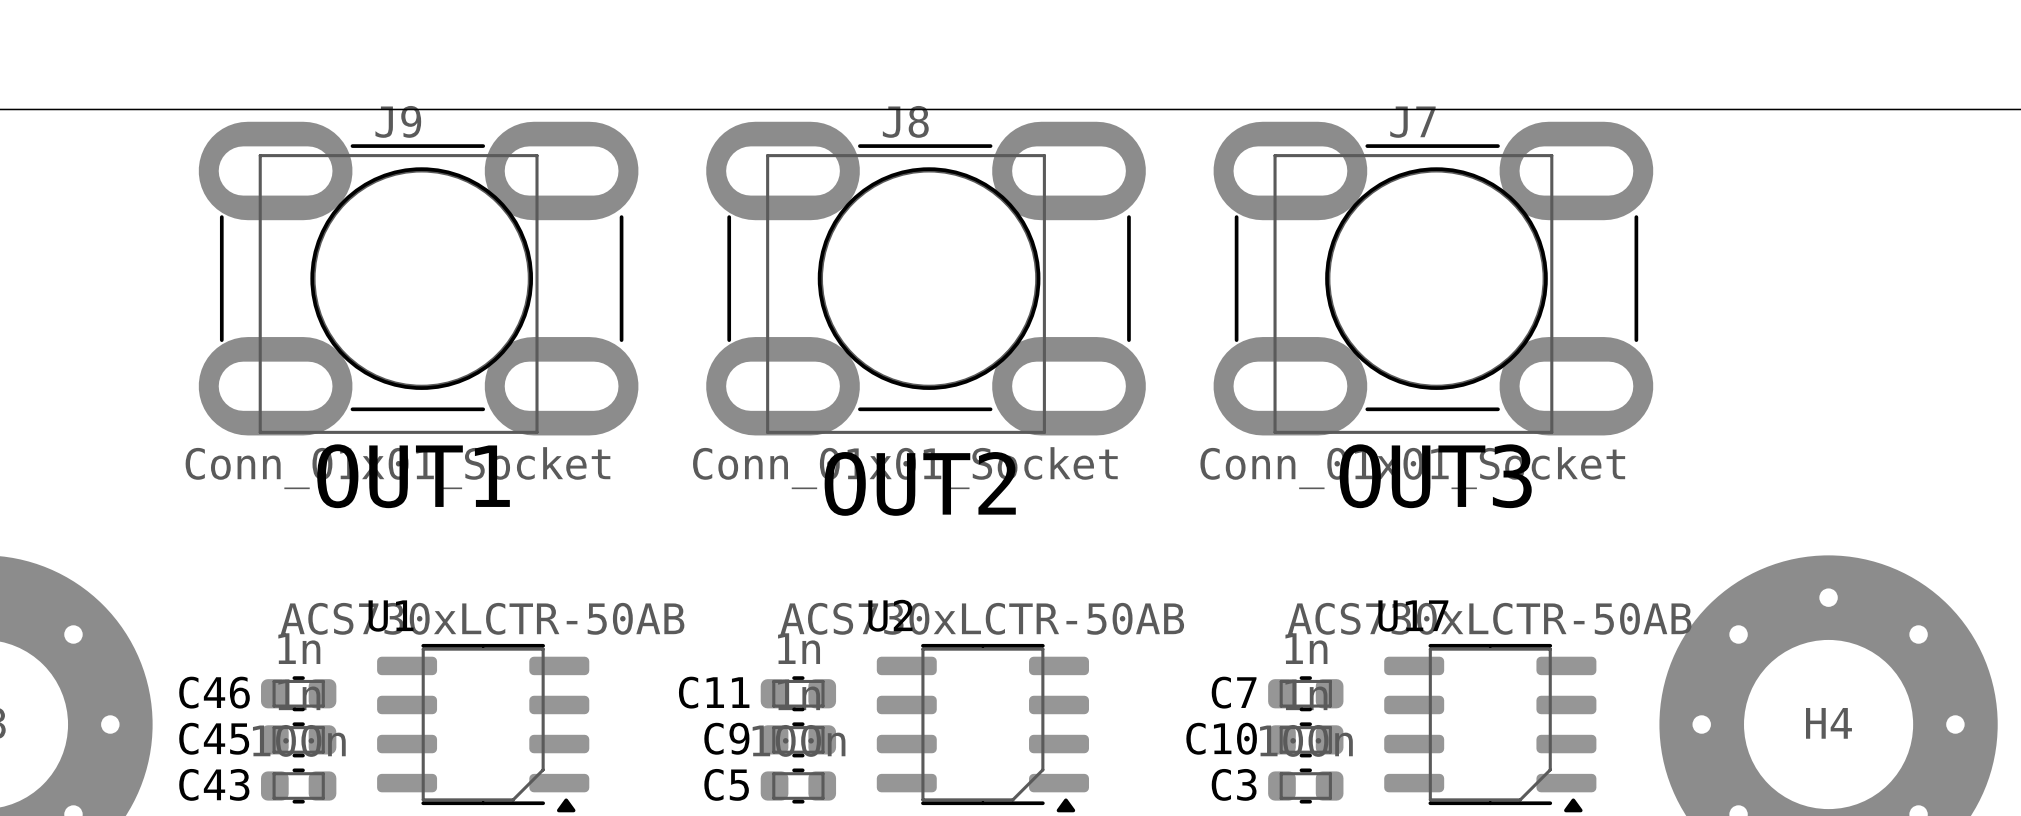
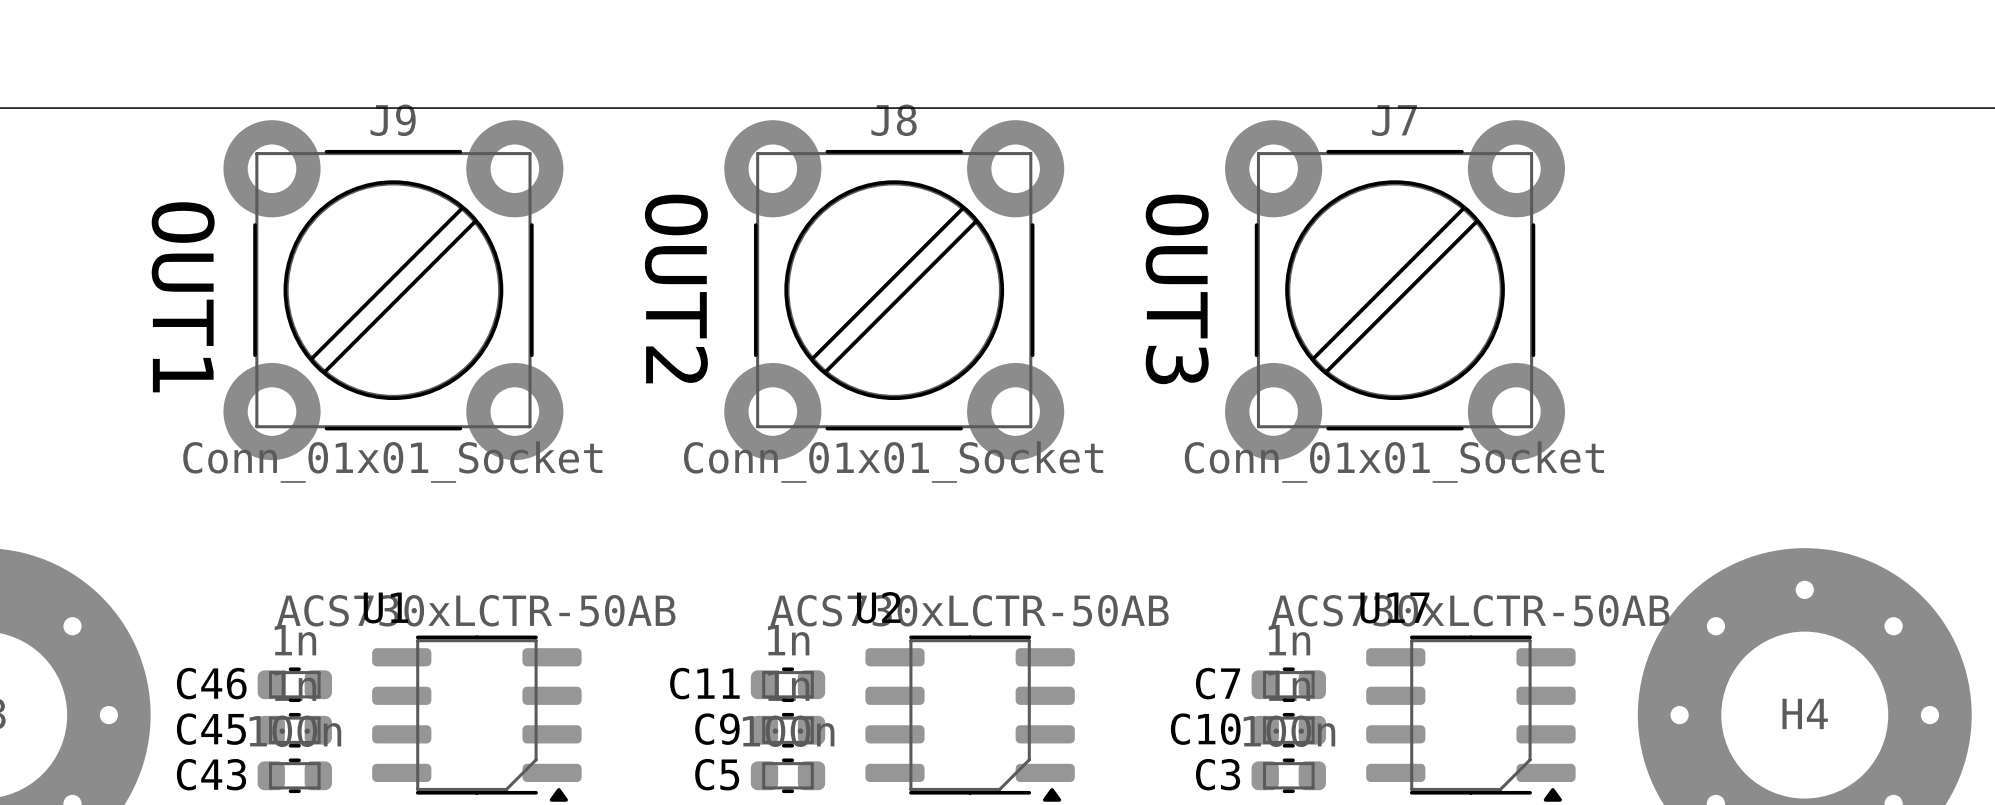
J9 footprint: [198, 121, 639, 436] -> [223, 120, 564, 461]
J8 footprint: [706, 121, 1146, 436] -> [724, 120, 1065, 461]
J7 footprint: [1213, 121, 1654, 436] -> [1225, 120, 1565, 461]
text rotation: 0° (413, 476) -> 90° clockwise (183, 297)
text position: OUT1 (413, 476) -> OUT1 (183, 297)
text rotation: 0° (1435, 476) -> 90° clockwise (1177, 289)
text position: OUT3 (1435, 476) -> OUT3 (1177, 289)
text rotation: 0° (920, 483) -> 90° clockwise (676, 289)
text position: OUT2 (920, 483) -> OUT2 (676, 289)

